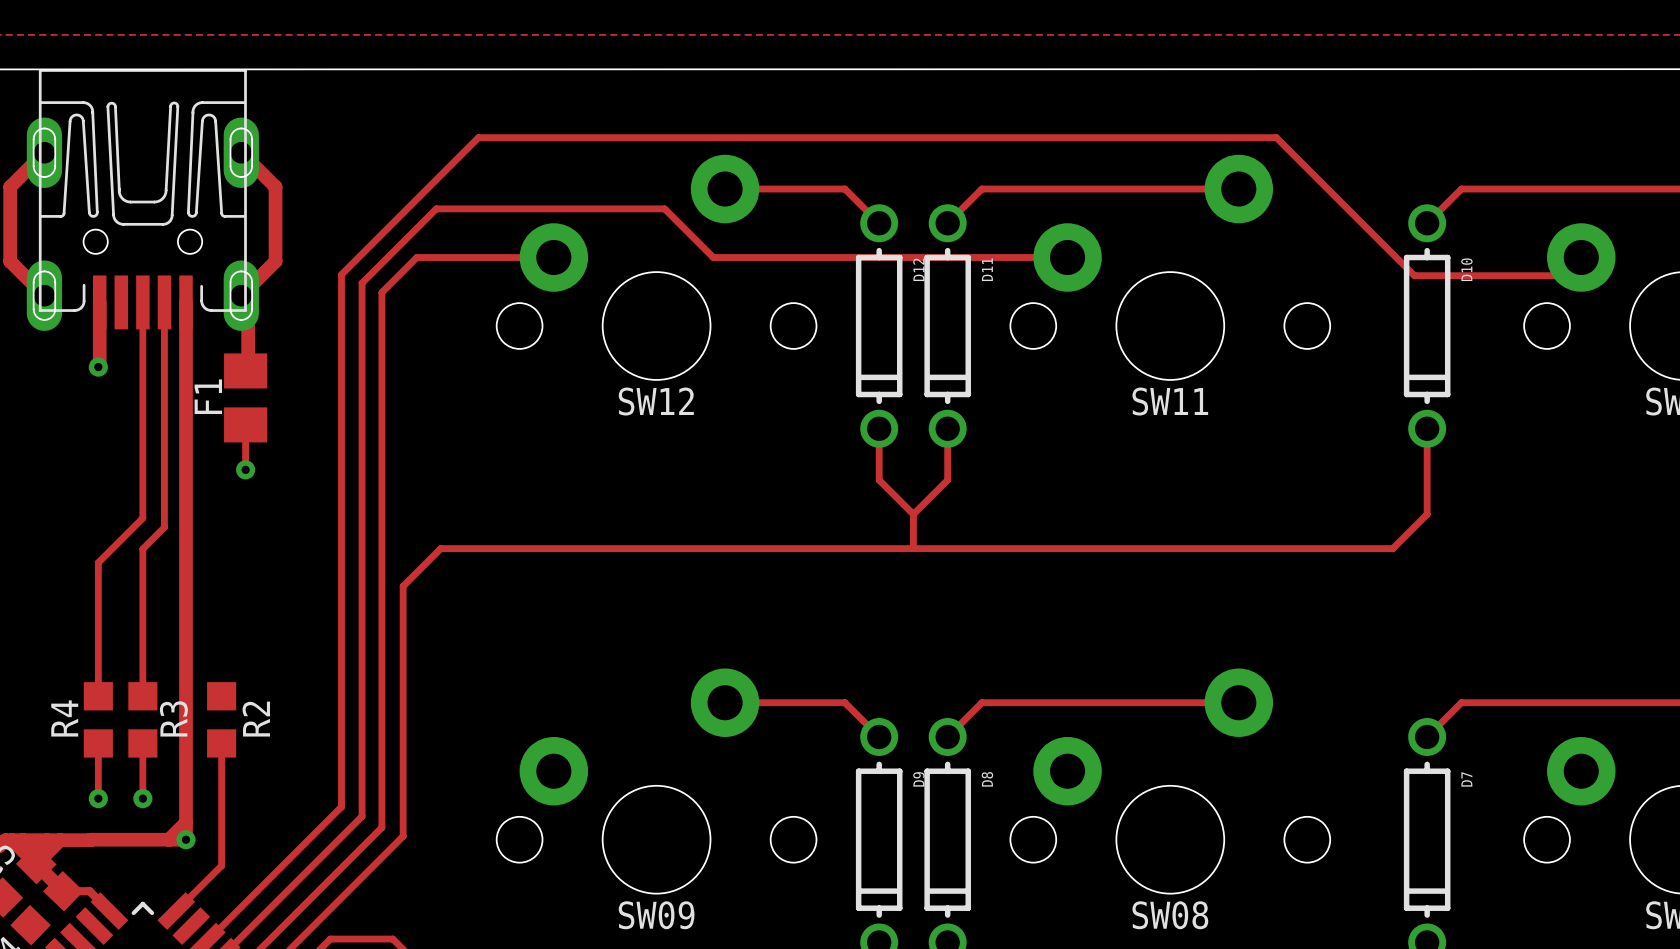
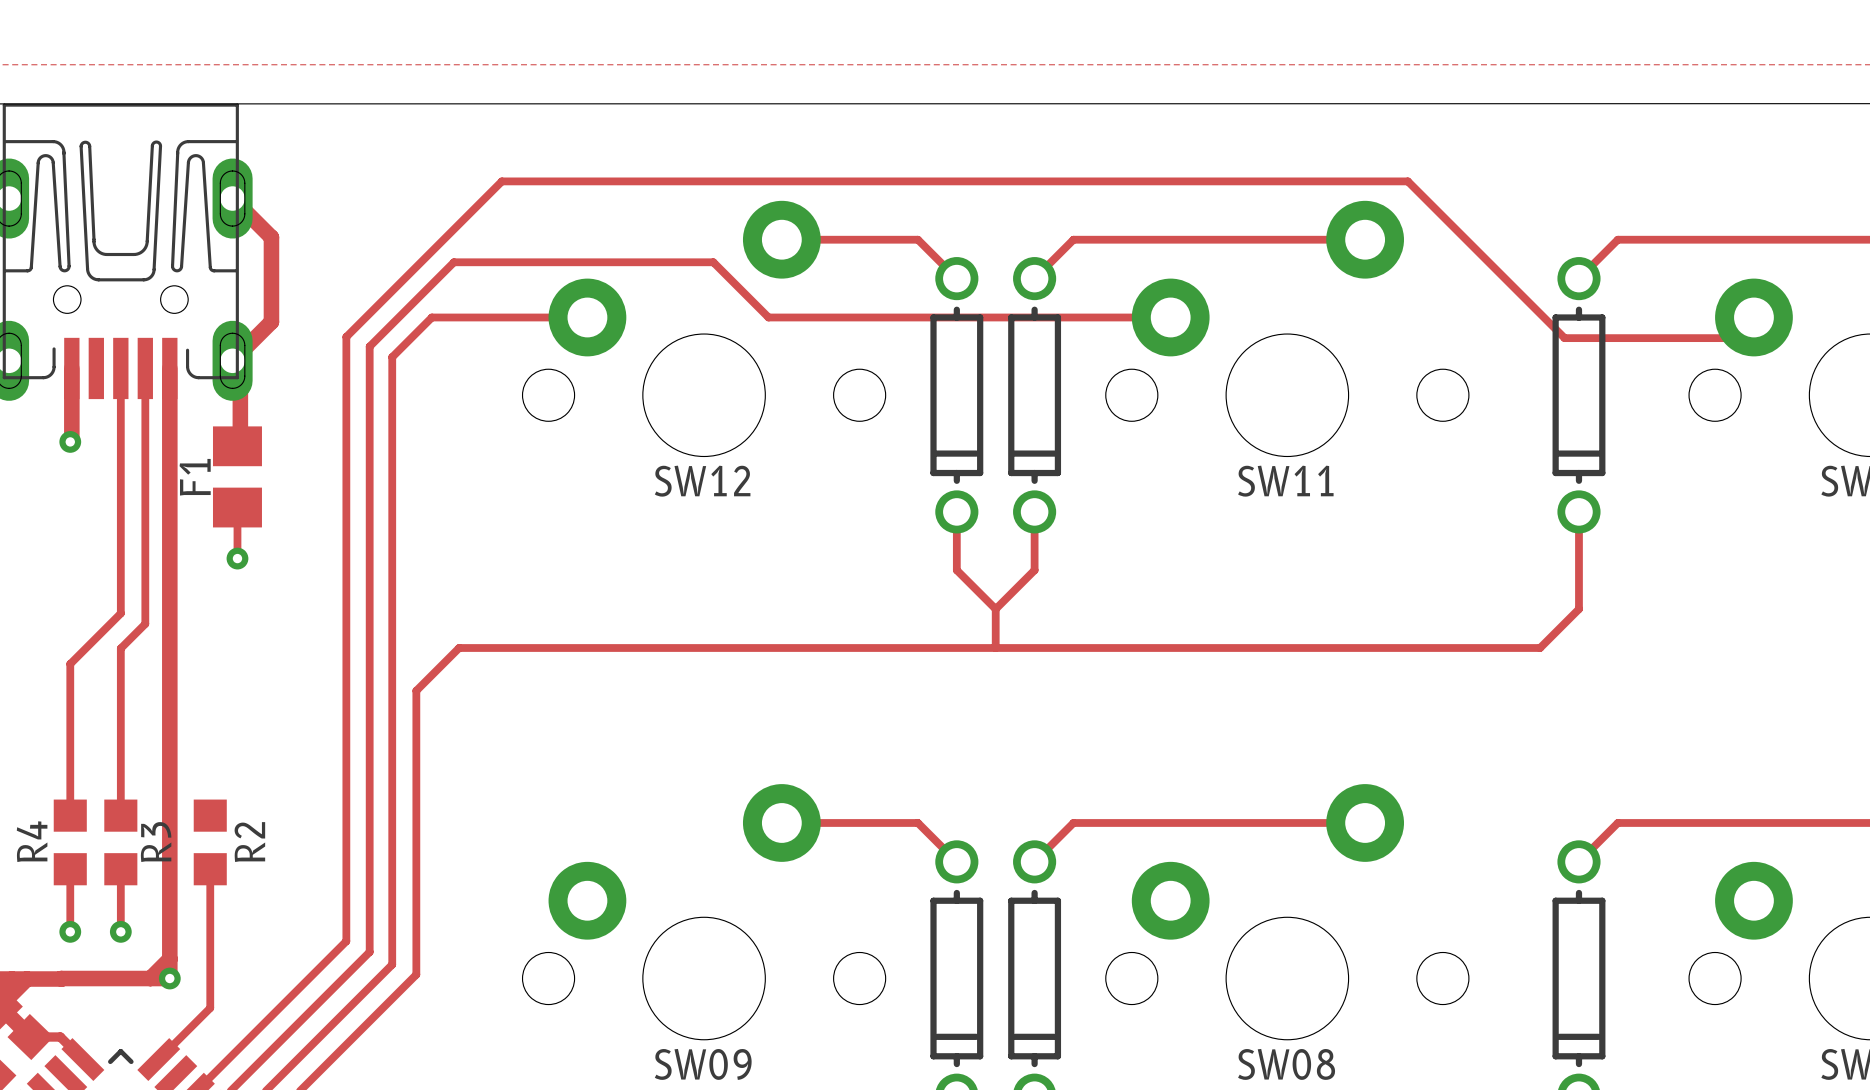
D12 name: D12 (918, 269) -> none
D11 name: D11 (987, 269) -> none
D10 name: D10 (1466, 269) -> none
D9 name: D9 (918, 779) -> none
D8 name: D8 (987, 779) -> none
D7 name: D7 (1466, 779) -> none

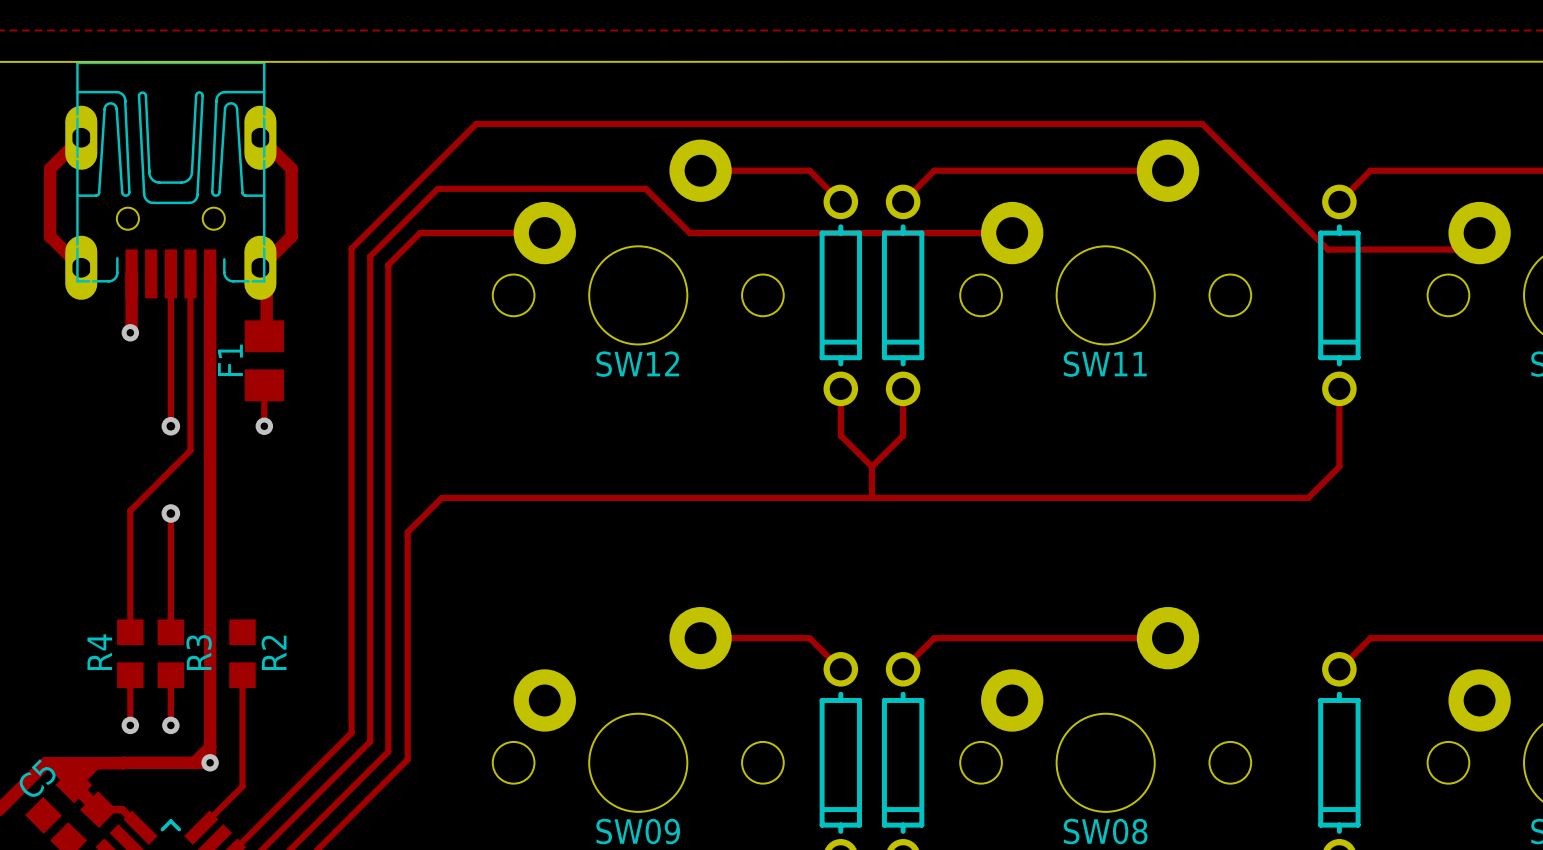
track: (120, 558) (120, 613) -> (190, 450) (170, 470)
via: none -> (170, 426)
track: (145, 588) (145, 623) (120, 648) (120, 667) -> none
via: none -> (170, 513)

